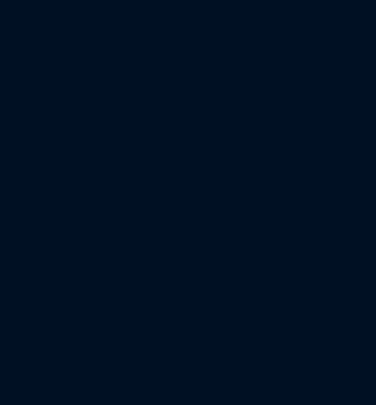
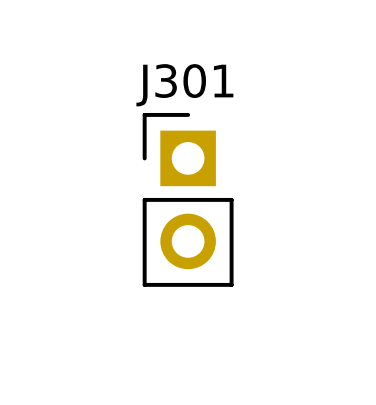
J301: none -> (188, 199)

